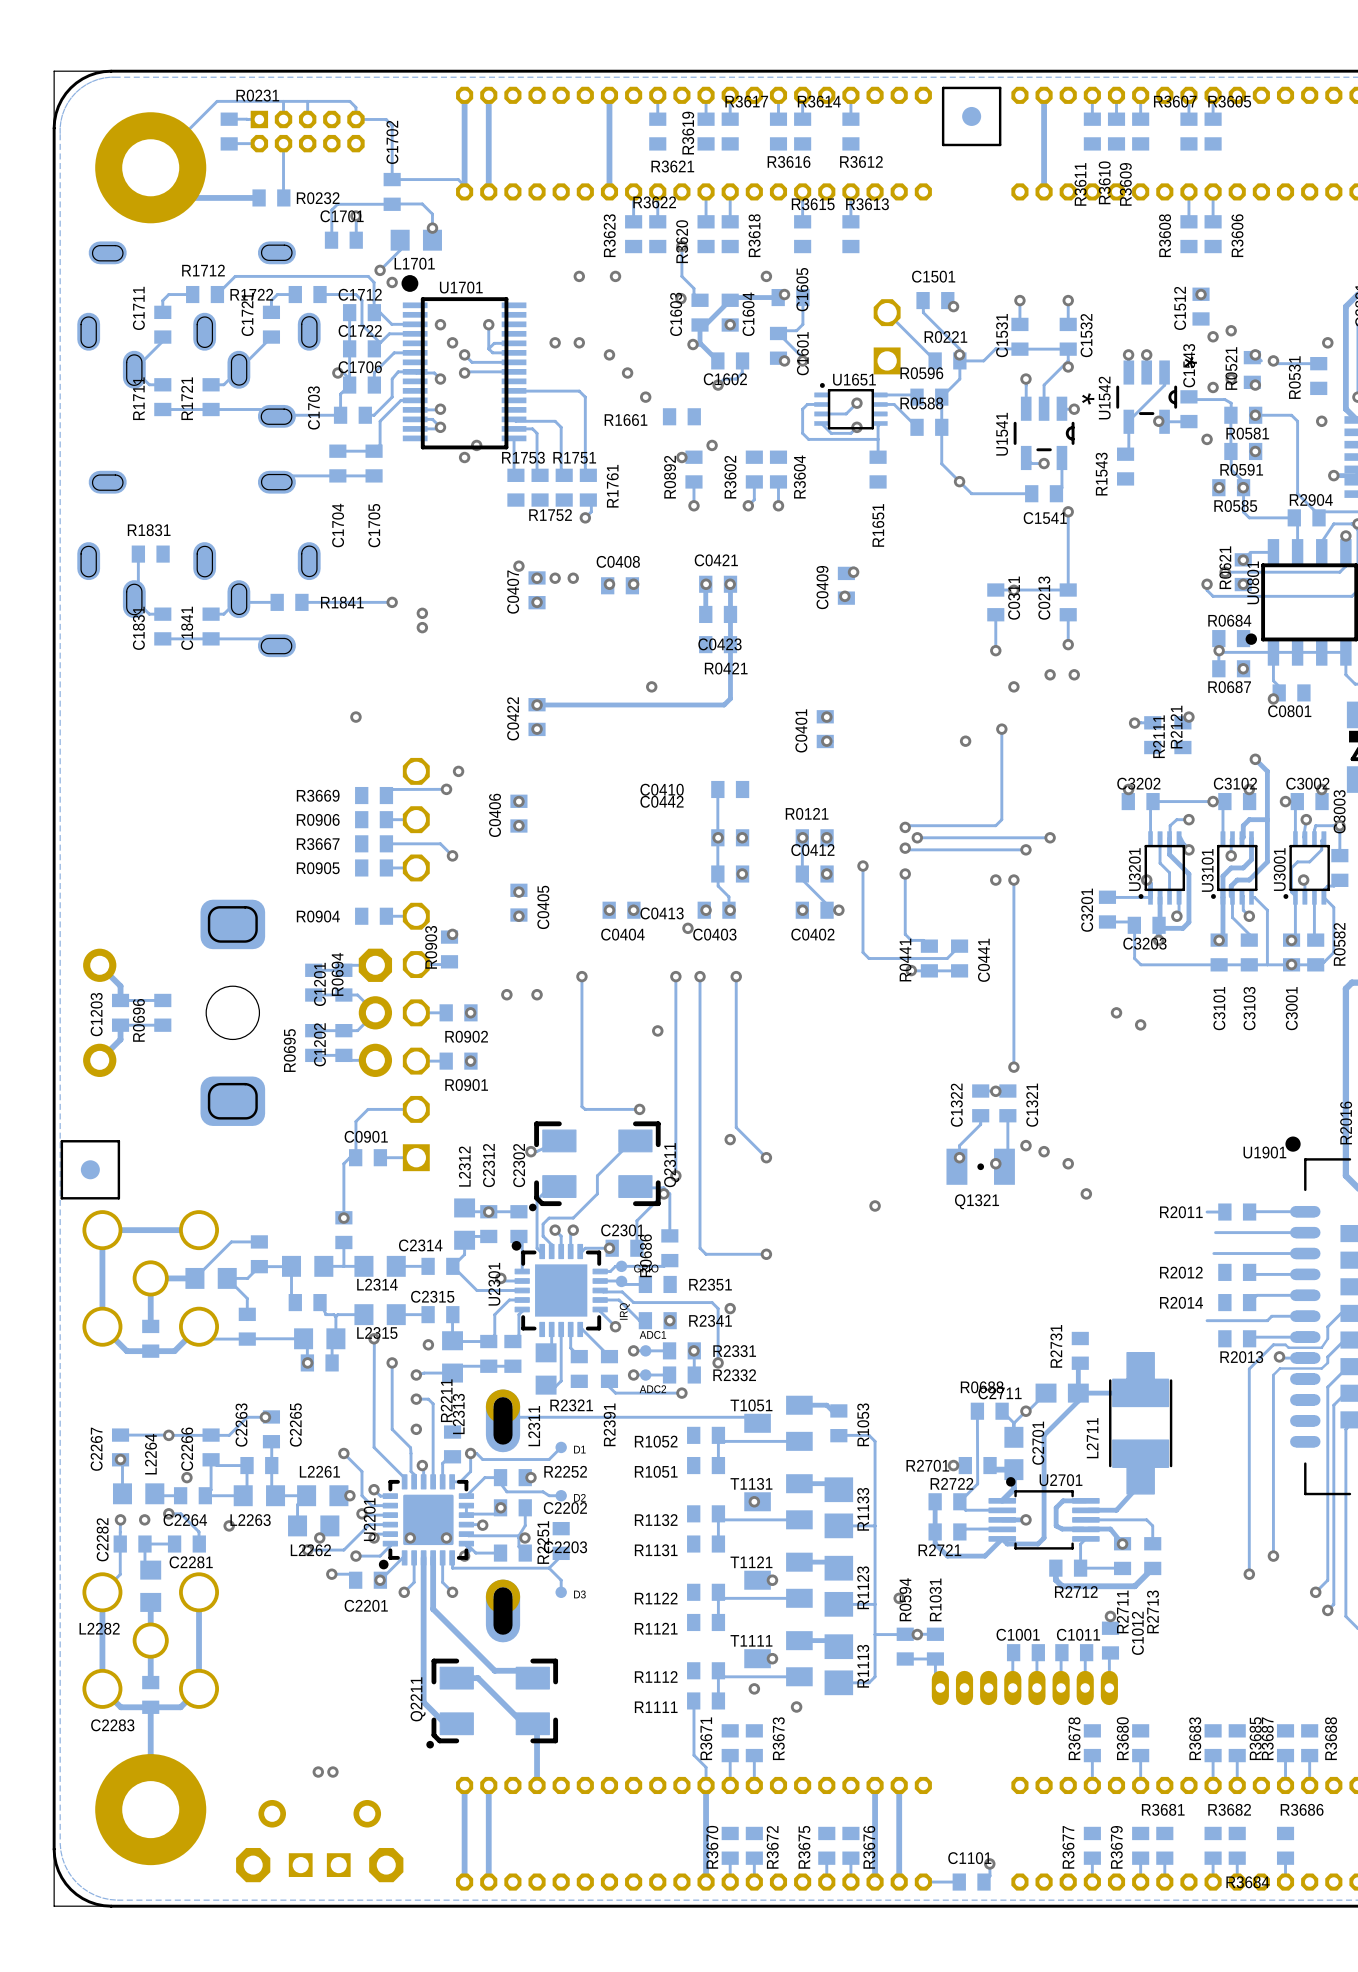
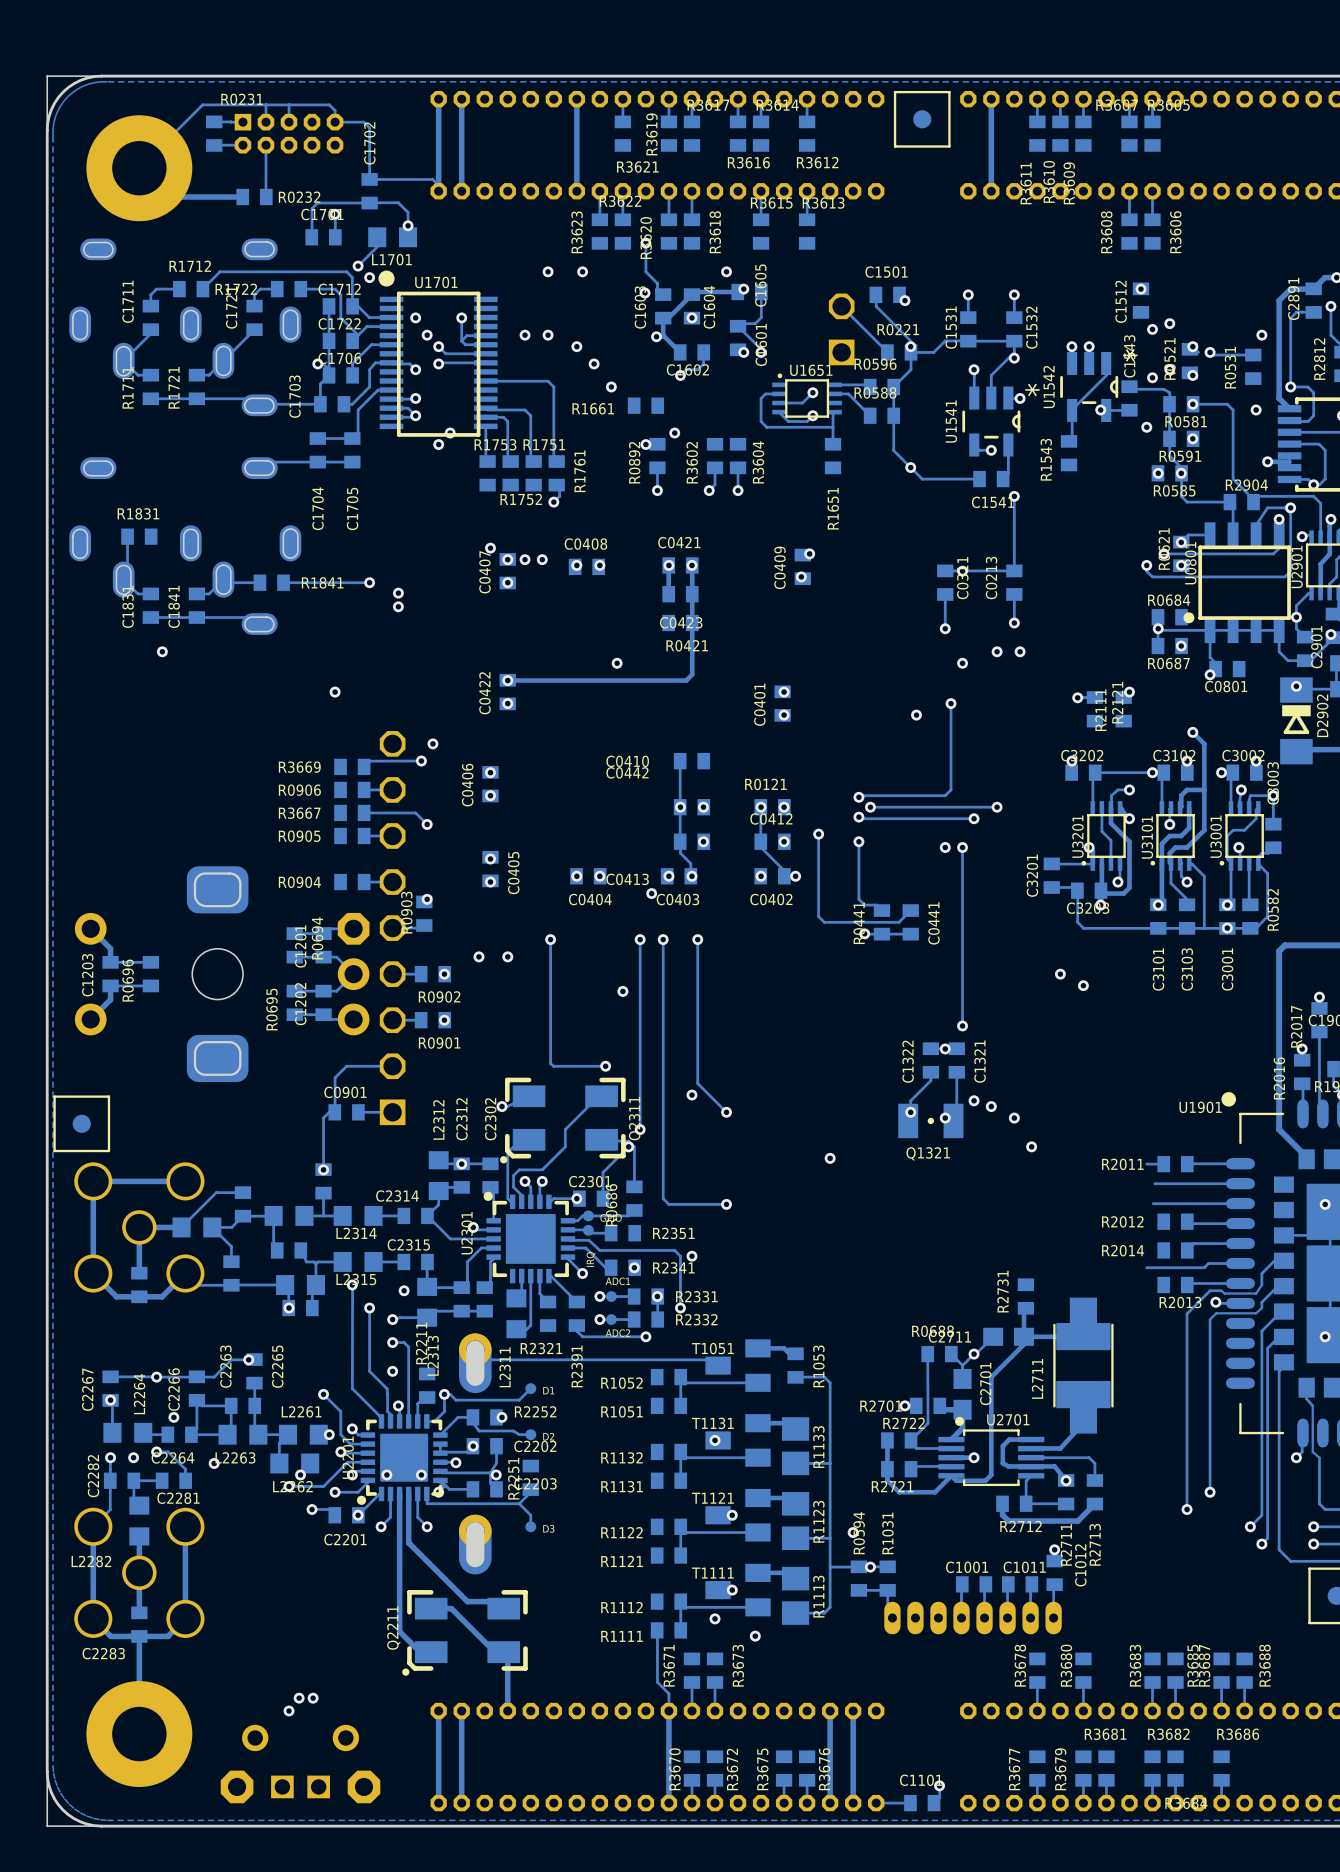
via: none -> (162, 651)
via: none -> (289, 1710)

